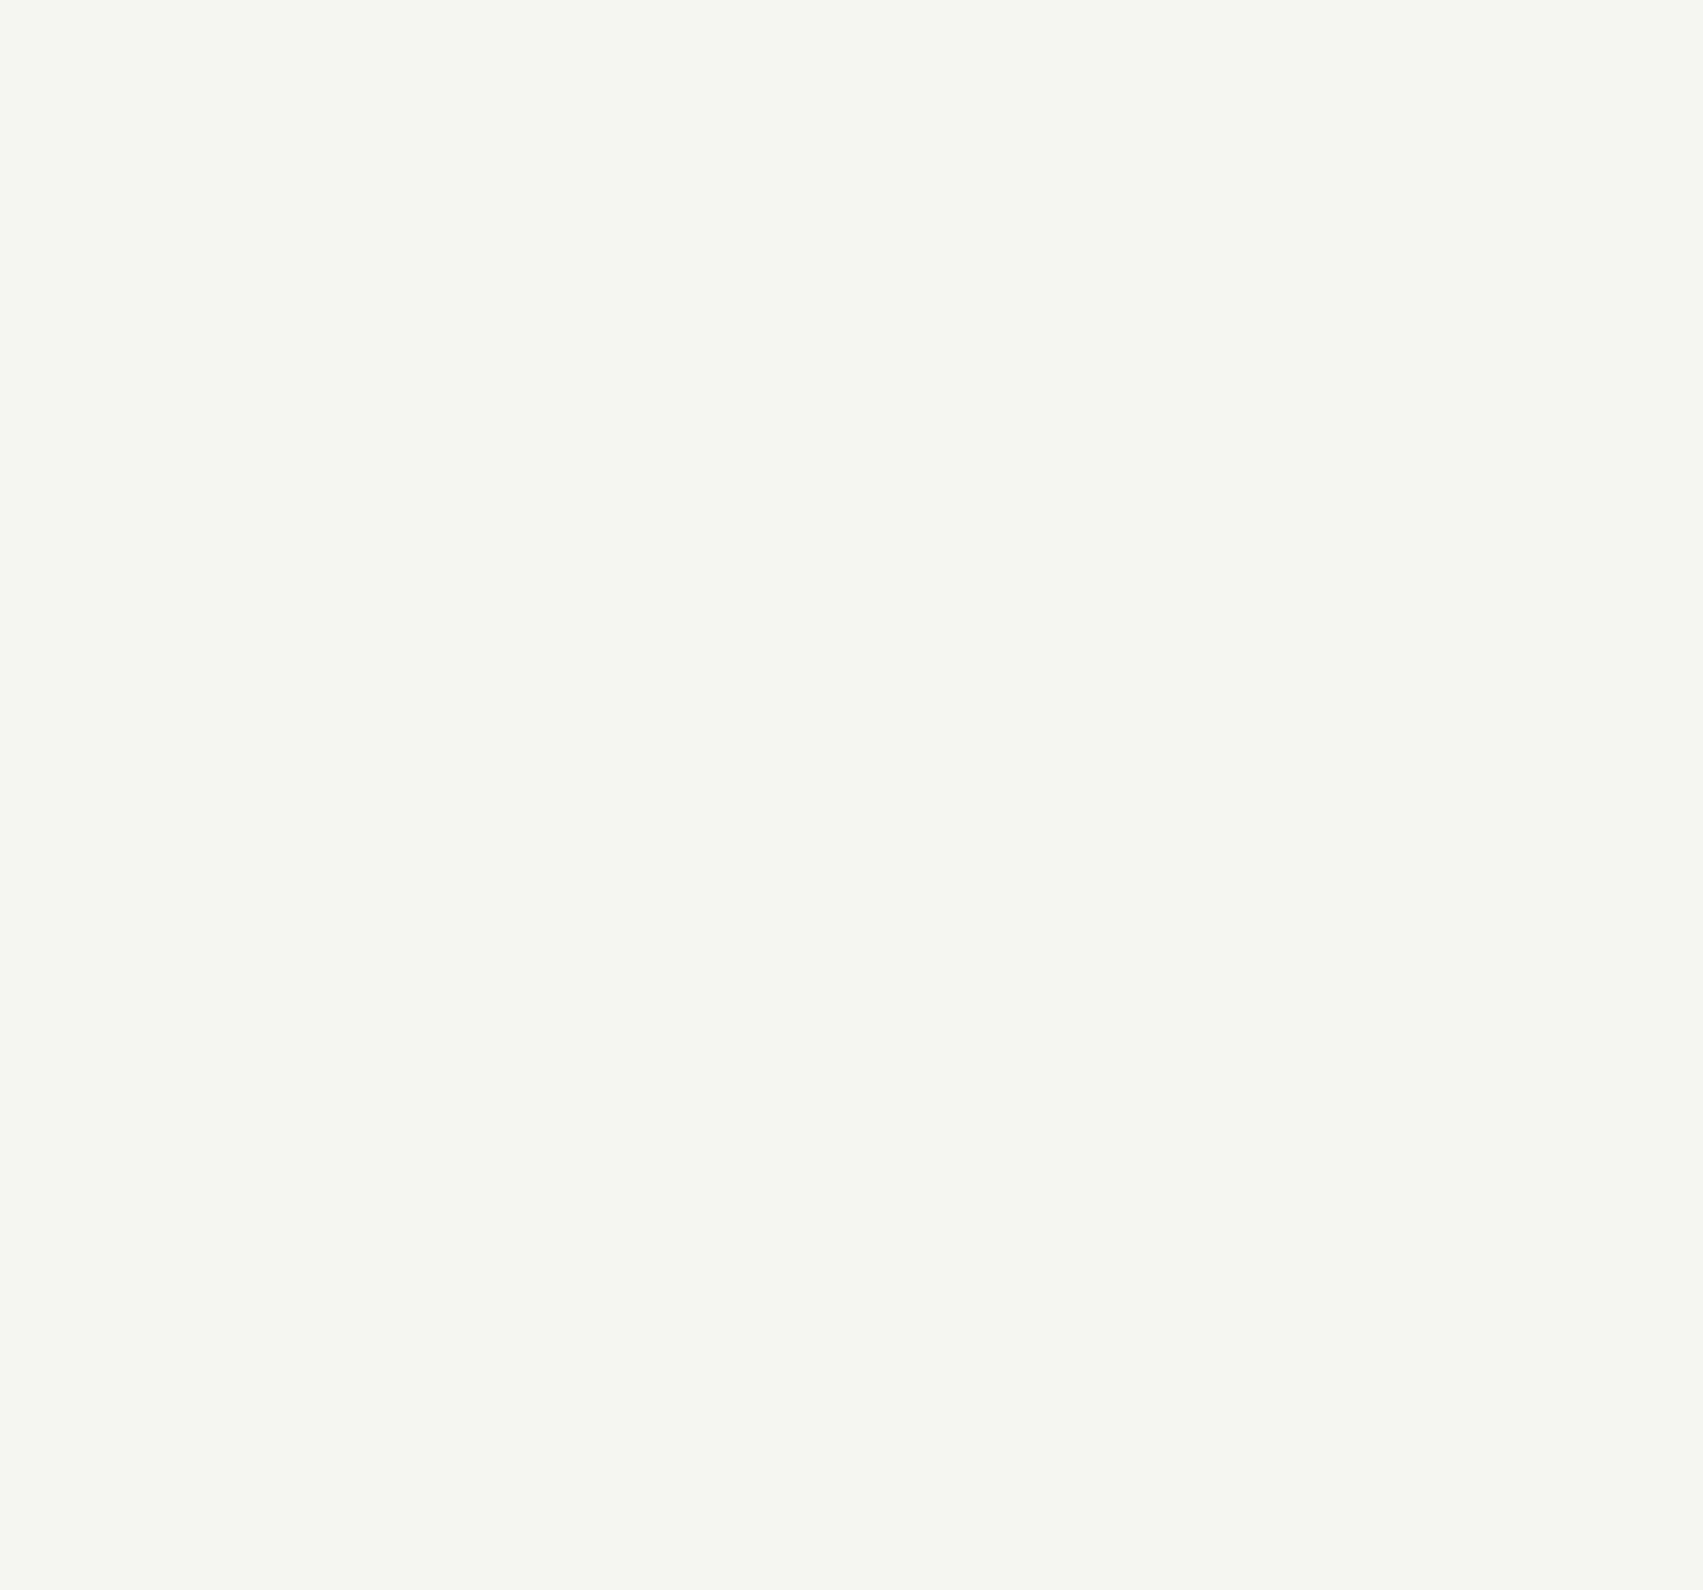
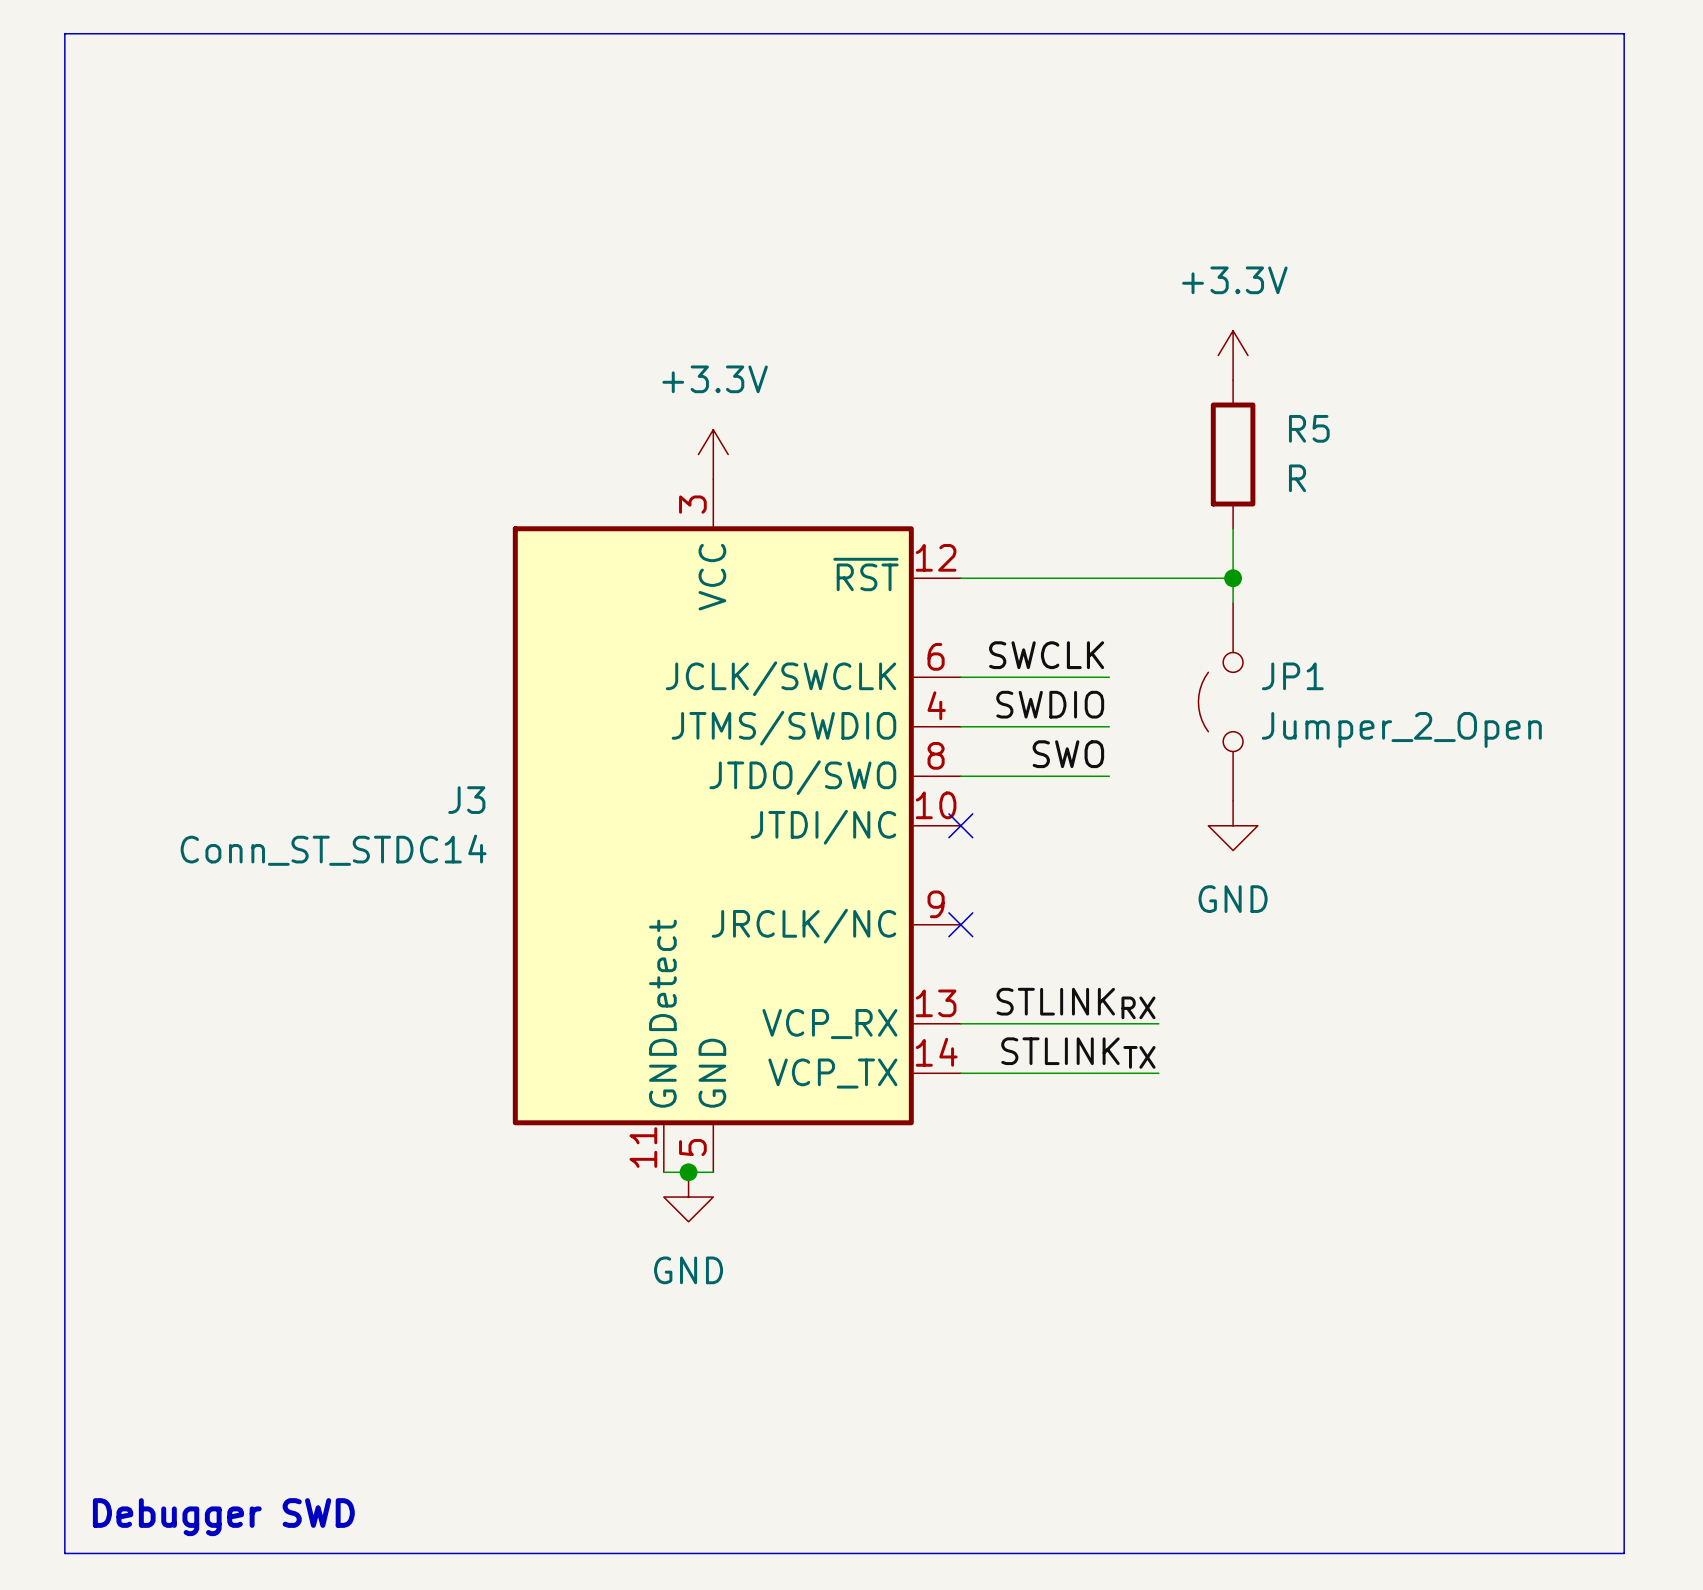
line: none -> (64, 33) (1624, 33) (1624, 1553) (64, 1553) (64, 33)
power symbol: none -> +3.3V (1233, 355)
power symbol: none -> +3.3V (713, 454)
R5: none -> R (1233, 454)
wire: none -> (1233, 528) (1233, 603)
wire: none -> (960, 578) (1233, 578)
junction: none -> (1233, 578)
label: none -> SWCLK (1046, 655)
wire: none -> (960, 677) (1109, 677)
JP1: none -> Jumper_2_Open (1220, 702)
label: none -> SWDIO (1050, 704)
wire: none -> (960, 726) (1109, 726)
label: none -> SWO (1068, 754)
wire: none -> (960, 776) (1109, 776)
J3: none -> Conn_ST_STDC14 (736, 825)
no-connect mark: none -> (960, 825)
power symbol: none -> GND (1233, 825)
no-connect mark: none -> (960, 924)
label: none -> STLINKRX (1076, 1003)
wire: none -> (960, 1023) (1158, 1023)
label: none -> STLINKTX (1078, 1053)
wire: none -> (960, 1073) (1158, 1073)
wire: none -> (663, 1172) (713, 1172)
junction: none -> (688, 1172)
power symbol: none -> GND (688, 1197)
text: none -> Debugger SWD (223, 1517)

